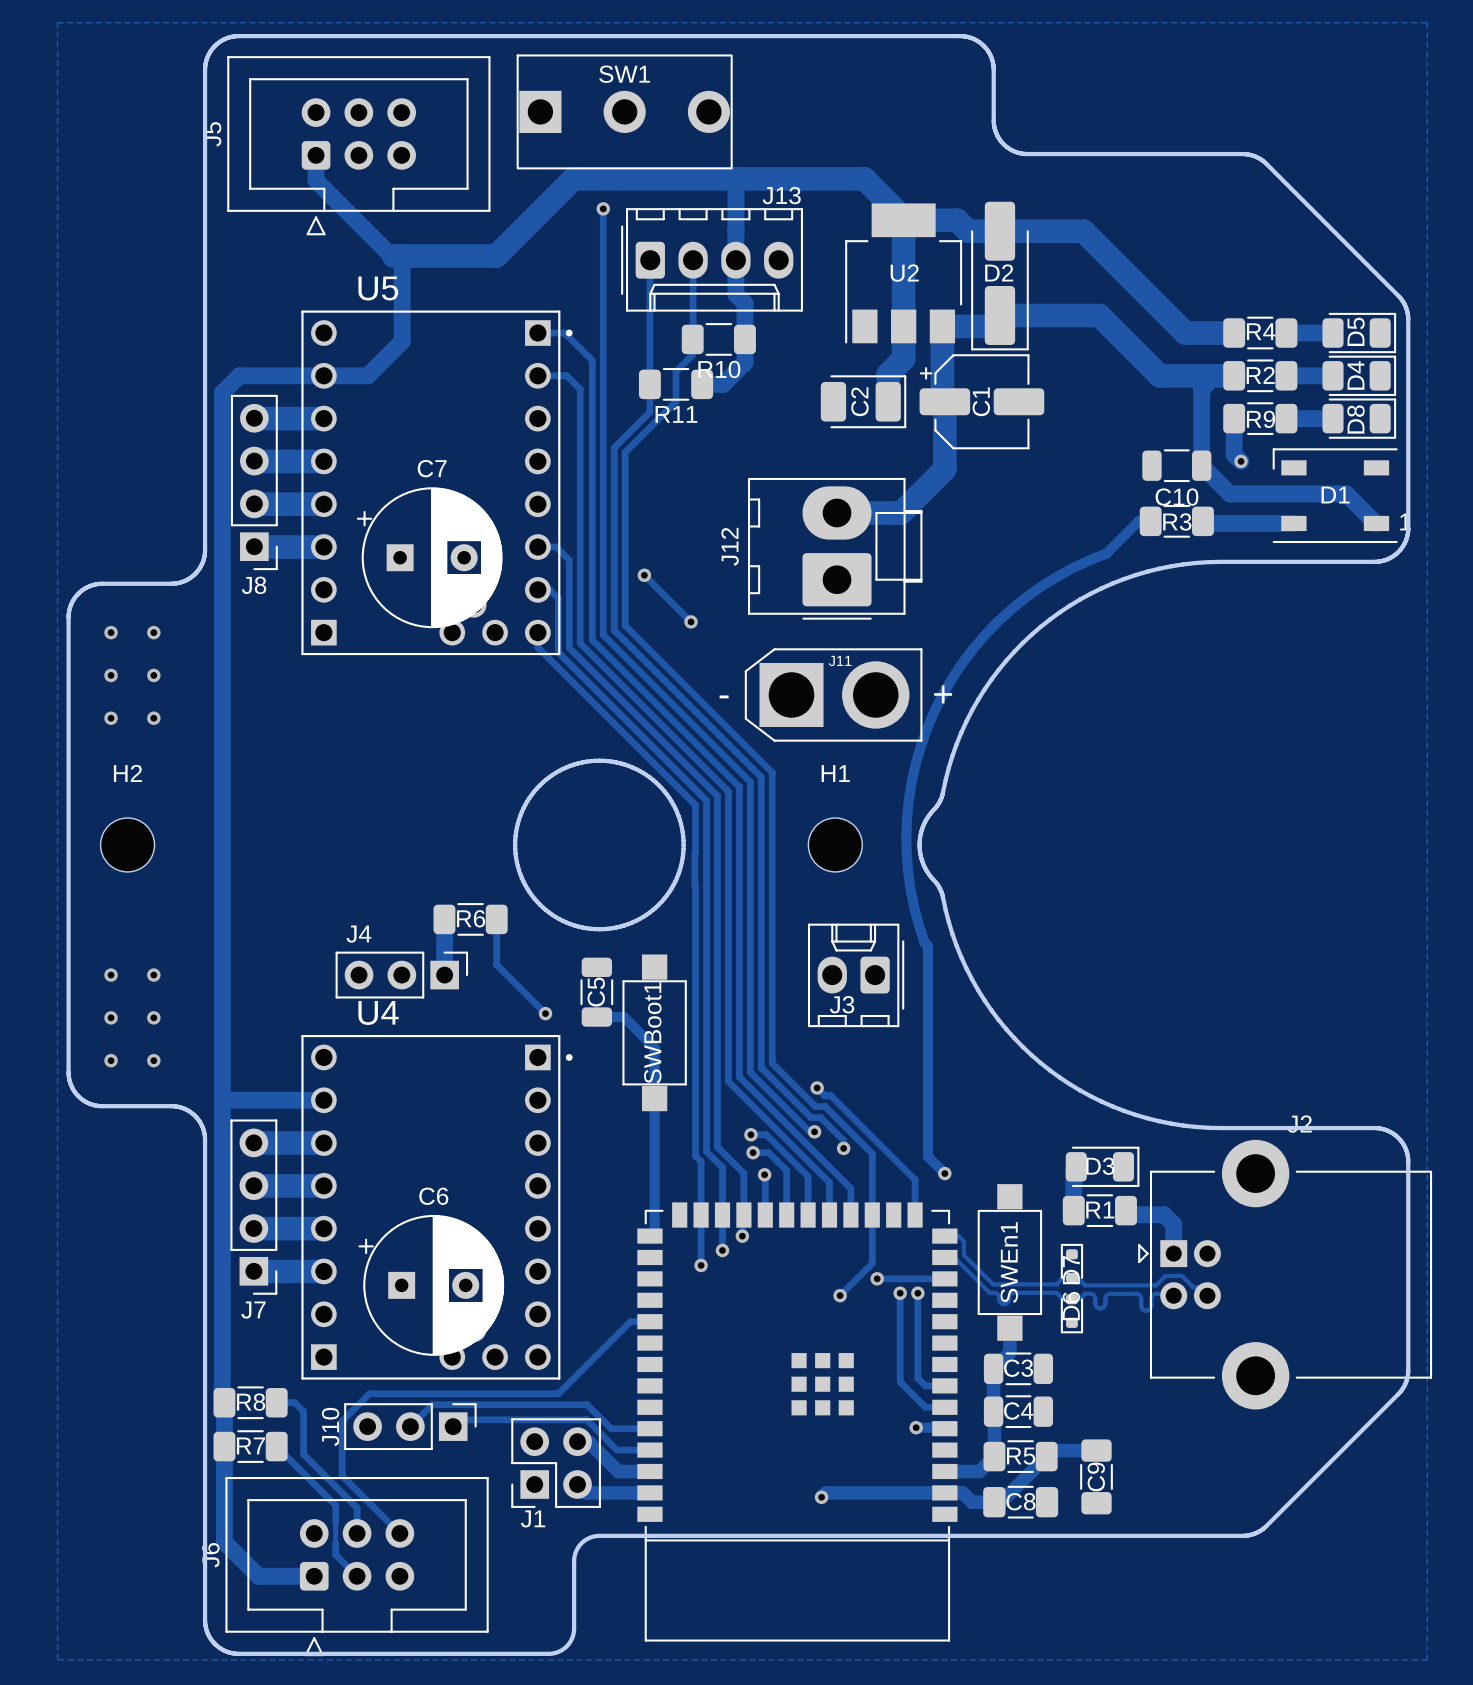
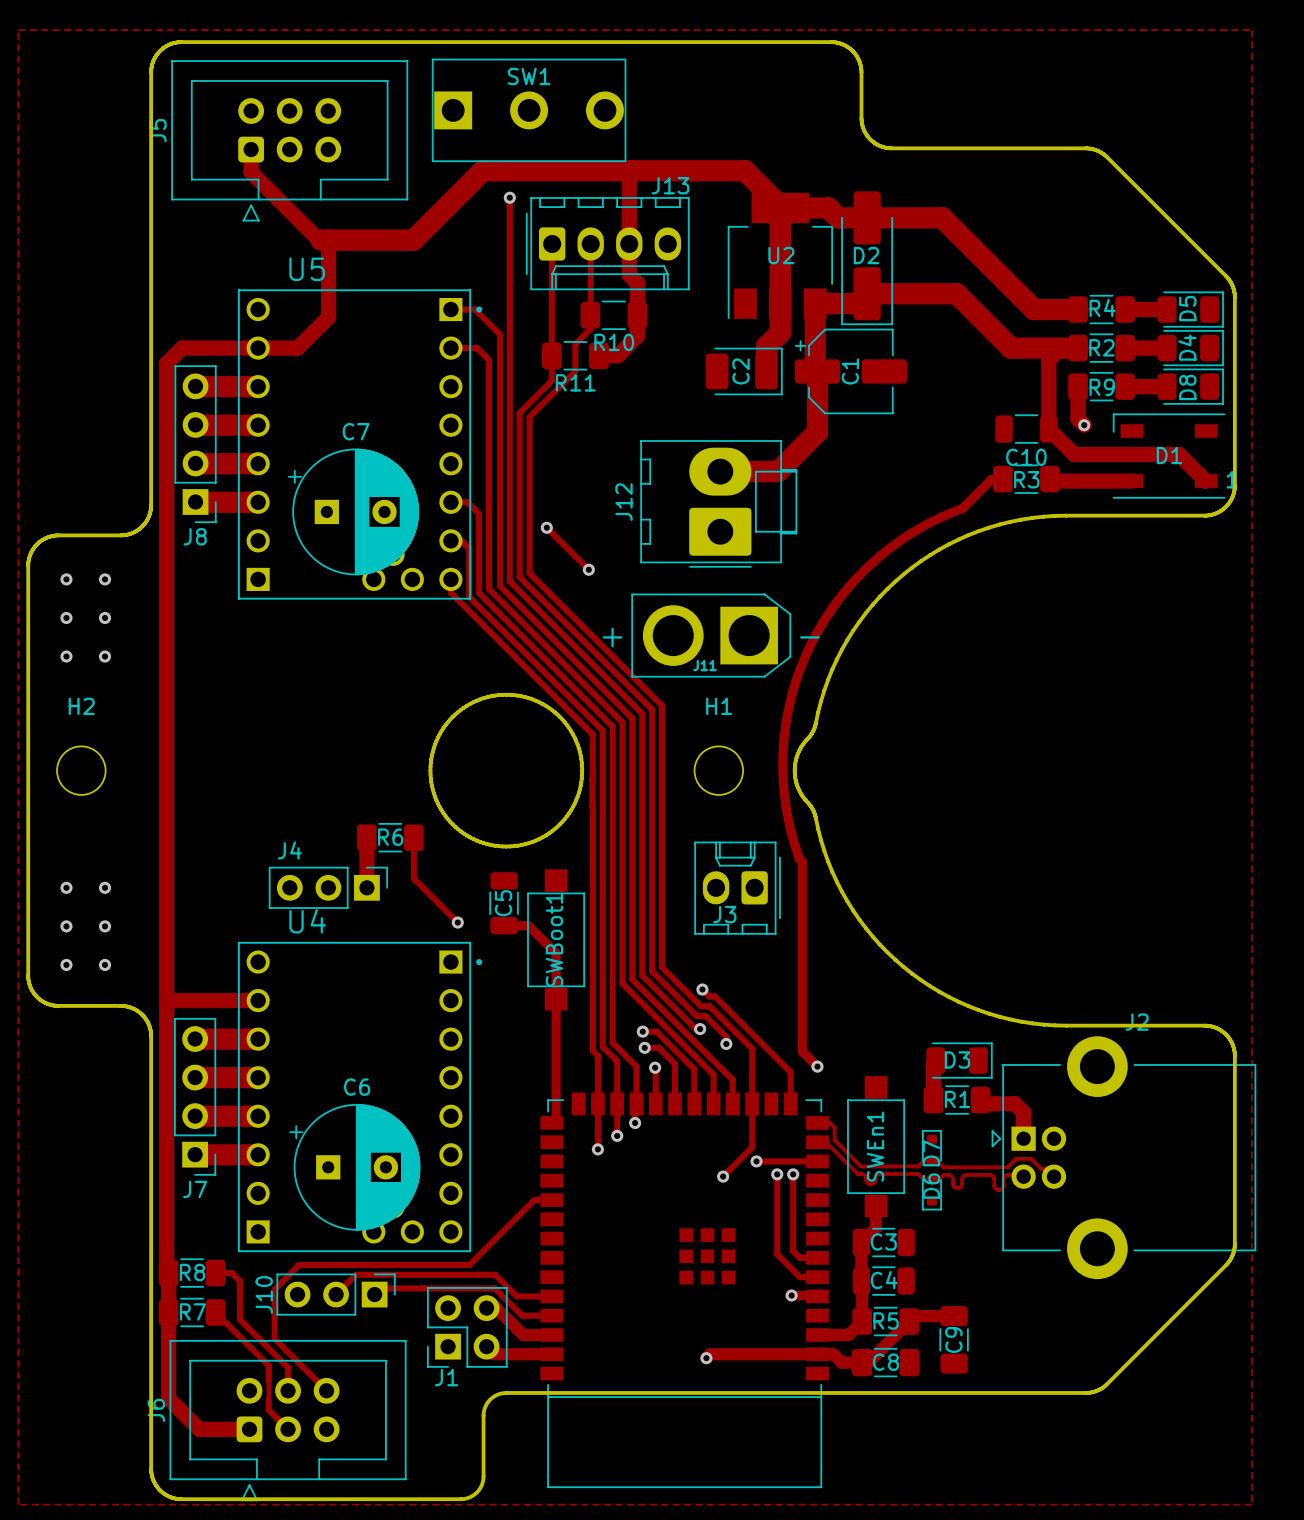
J11 rotation: 0° (833, 694) -> 180° (711, 635)

